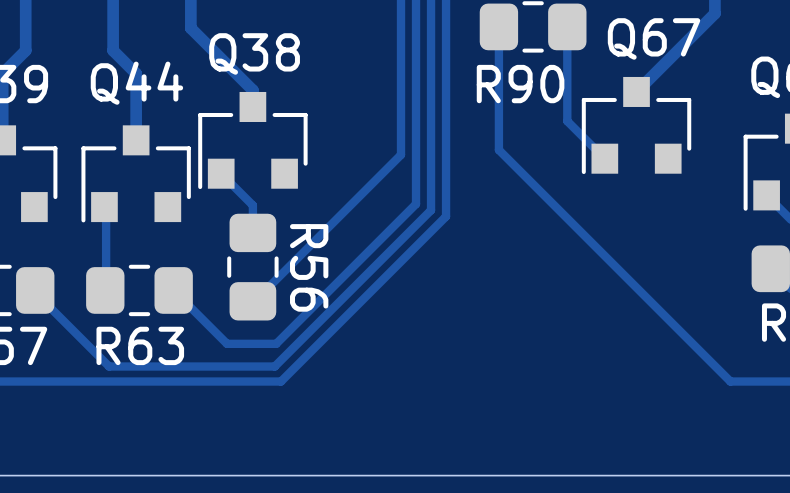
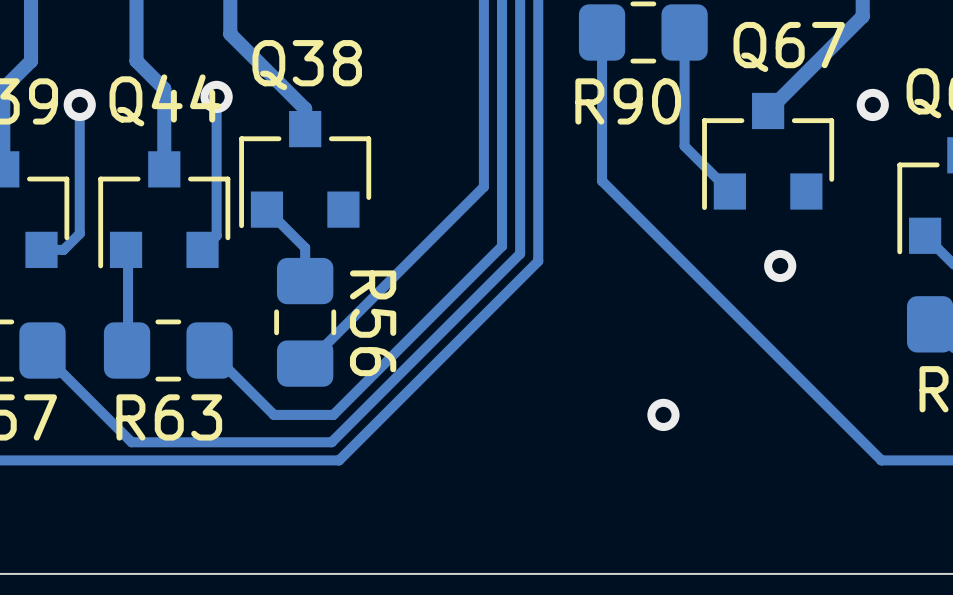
track: none -> (216, 96) (216, 235) (202, 249)
via: none -> (216, 96)
track: none -> (79, 104) (79, 233) (63, 249) (41, 249)
via: none -> (79, 104)
via: none -> (872, 104)
via: none -> (780, 265)
via: none -> (663, 414)

